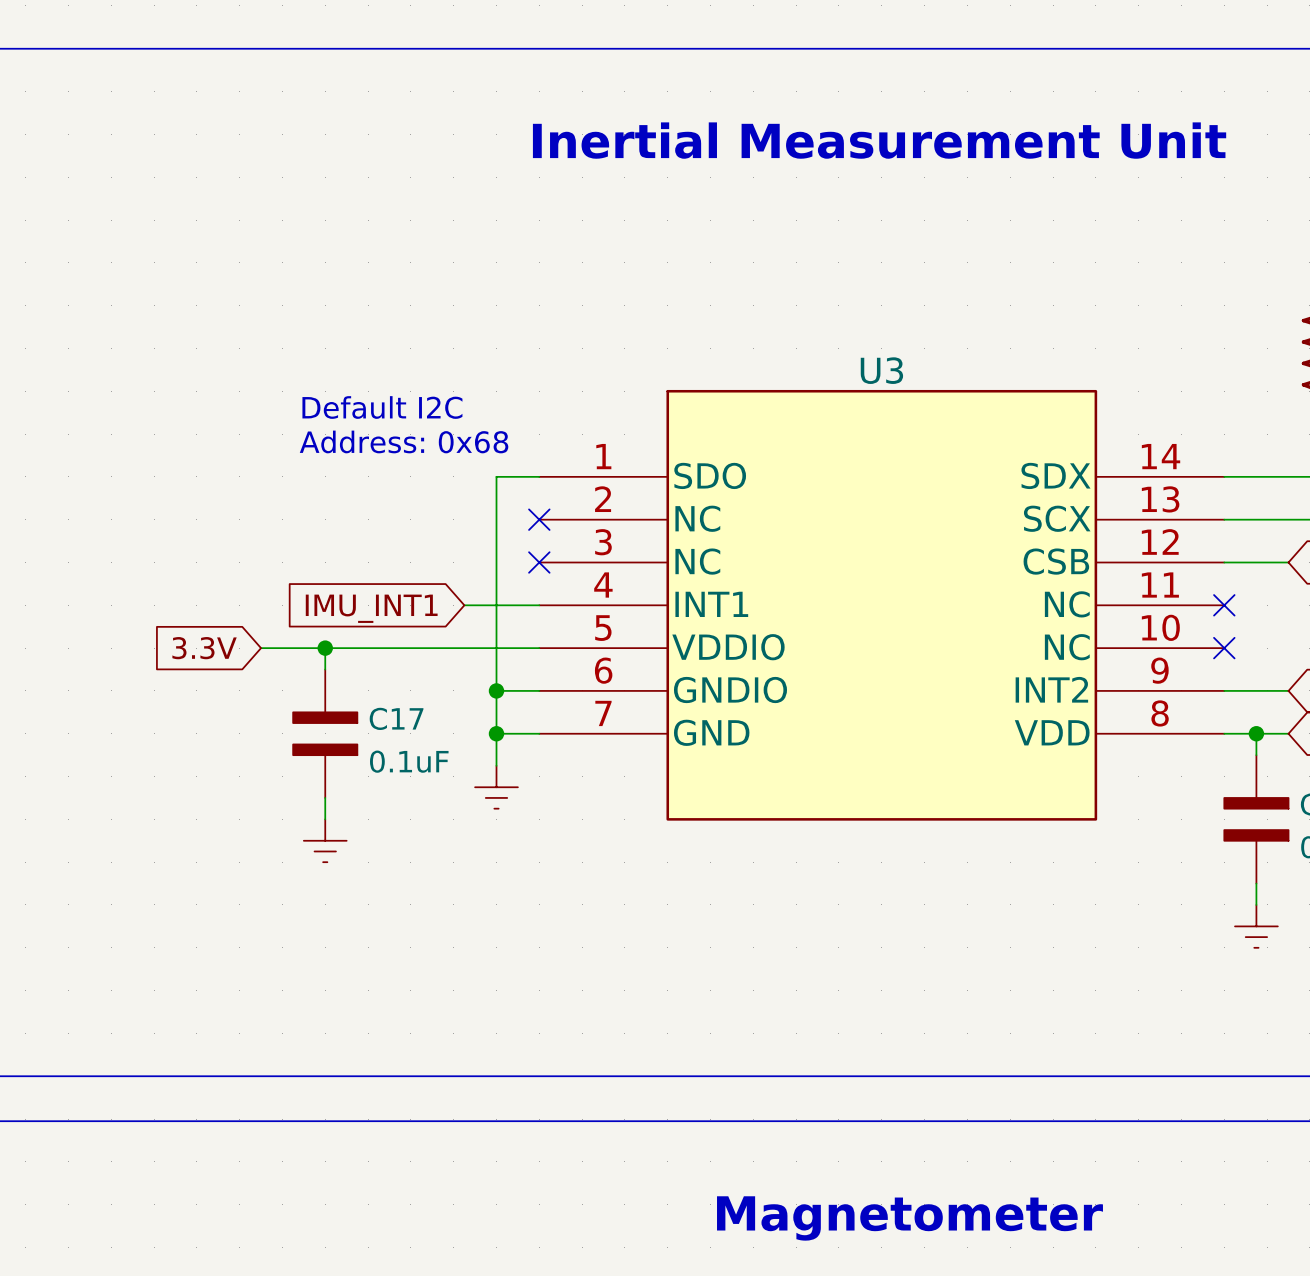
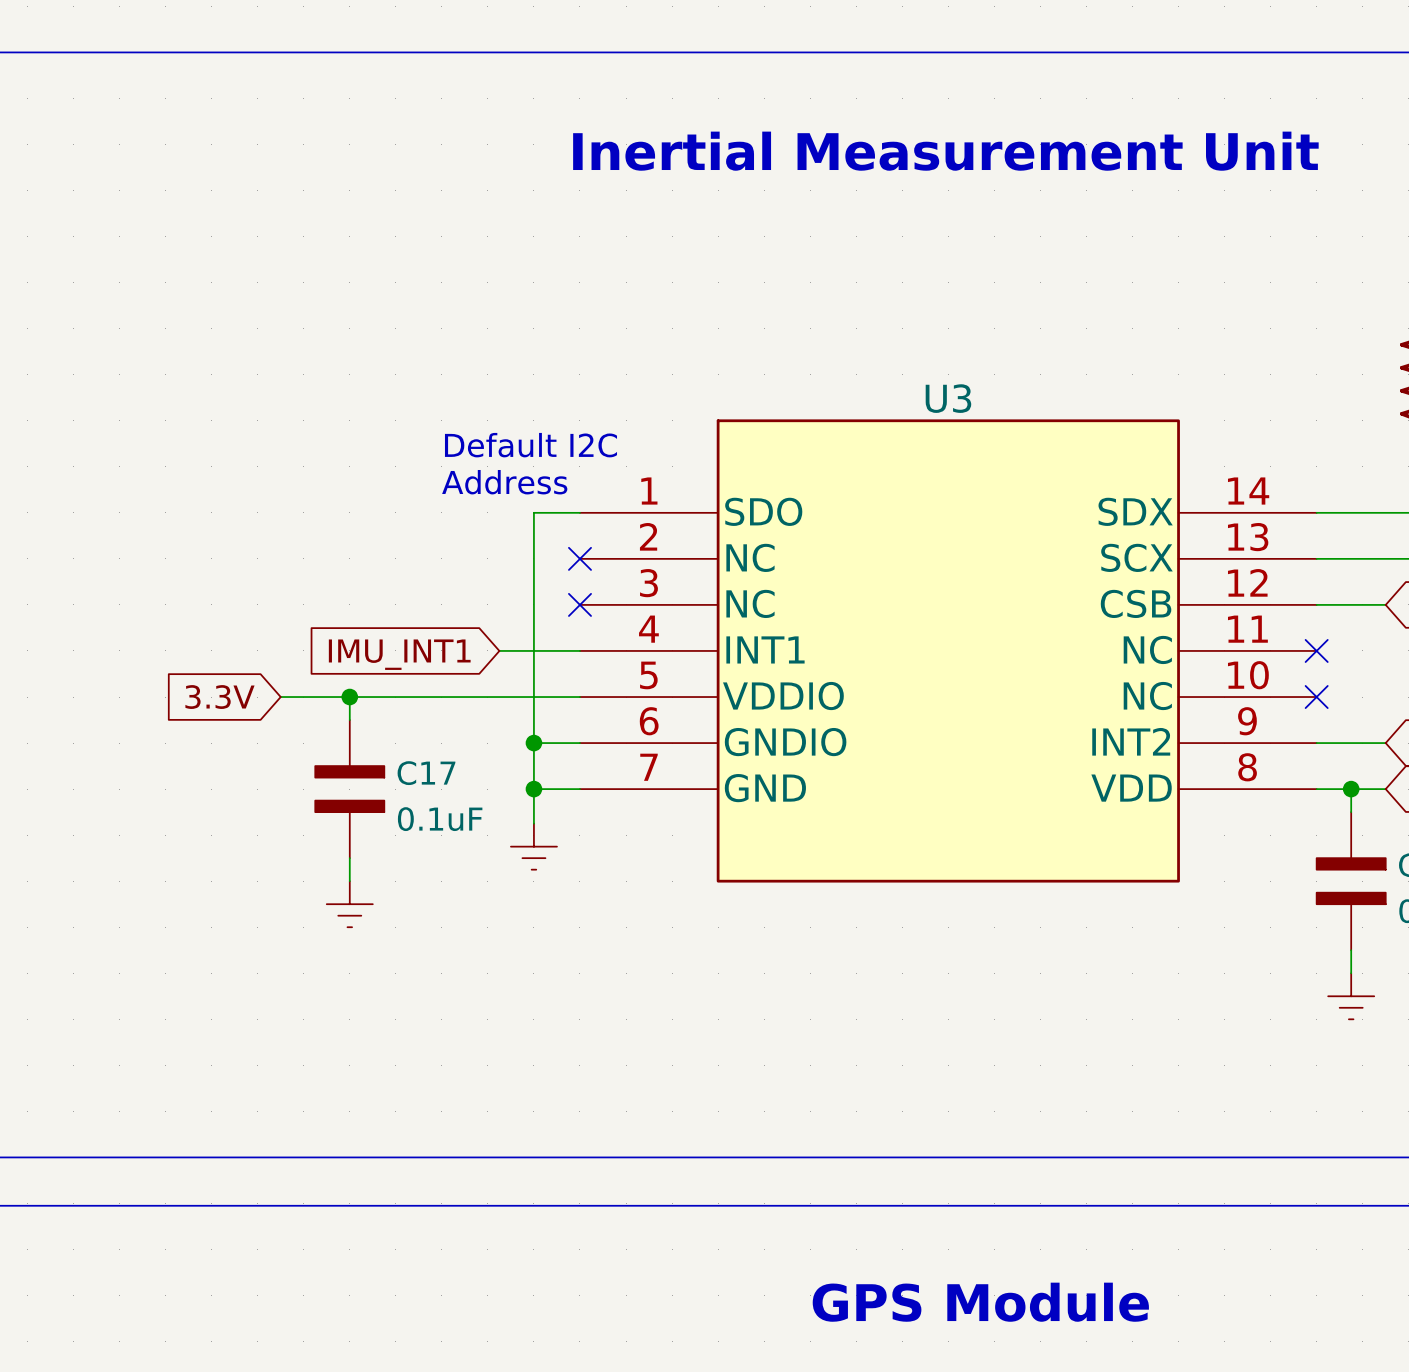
text position: Default I2C (382, 407) -> Default I2C (530, 445)
text: Address: 0x68 (404, 441) -> Address (504, 482)
text: none -> GPS Module (980, 1302)
text: Magnetometer (909, 1218) -> none

